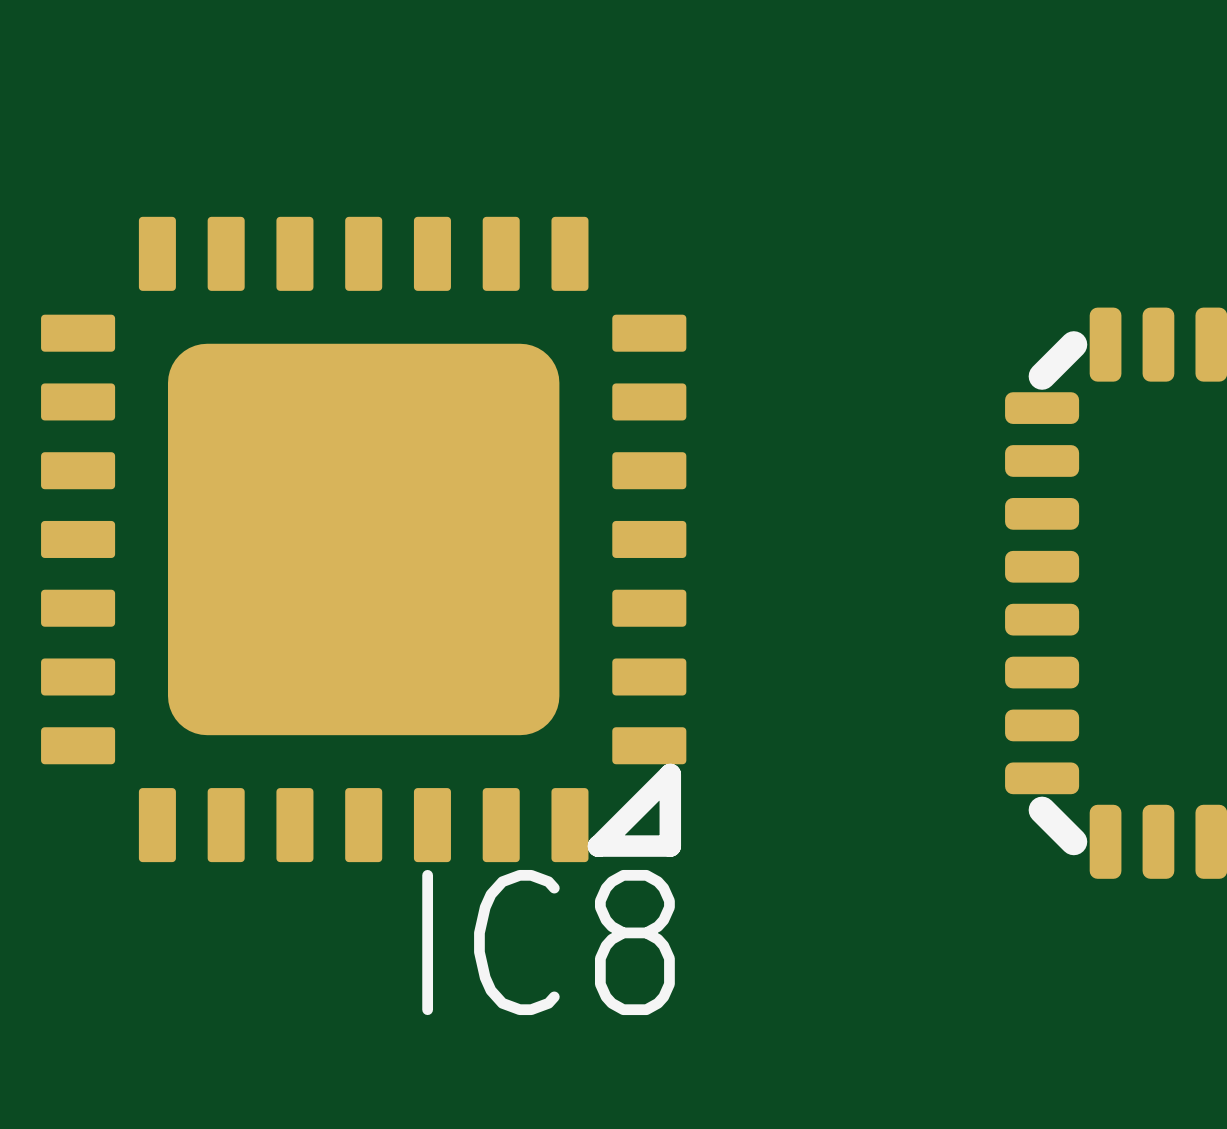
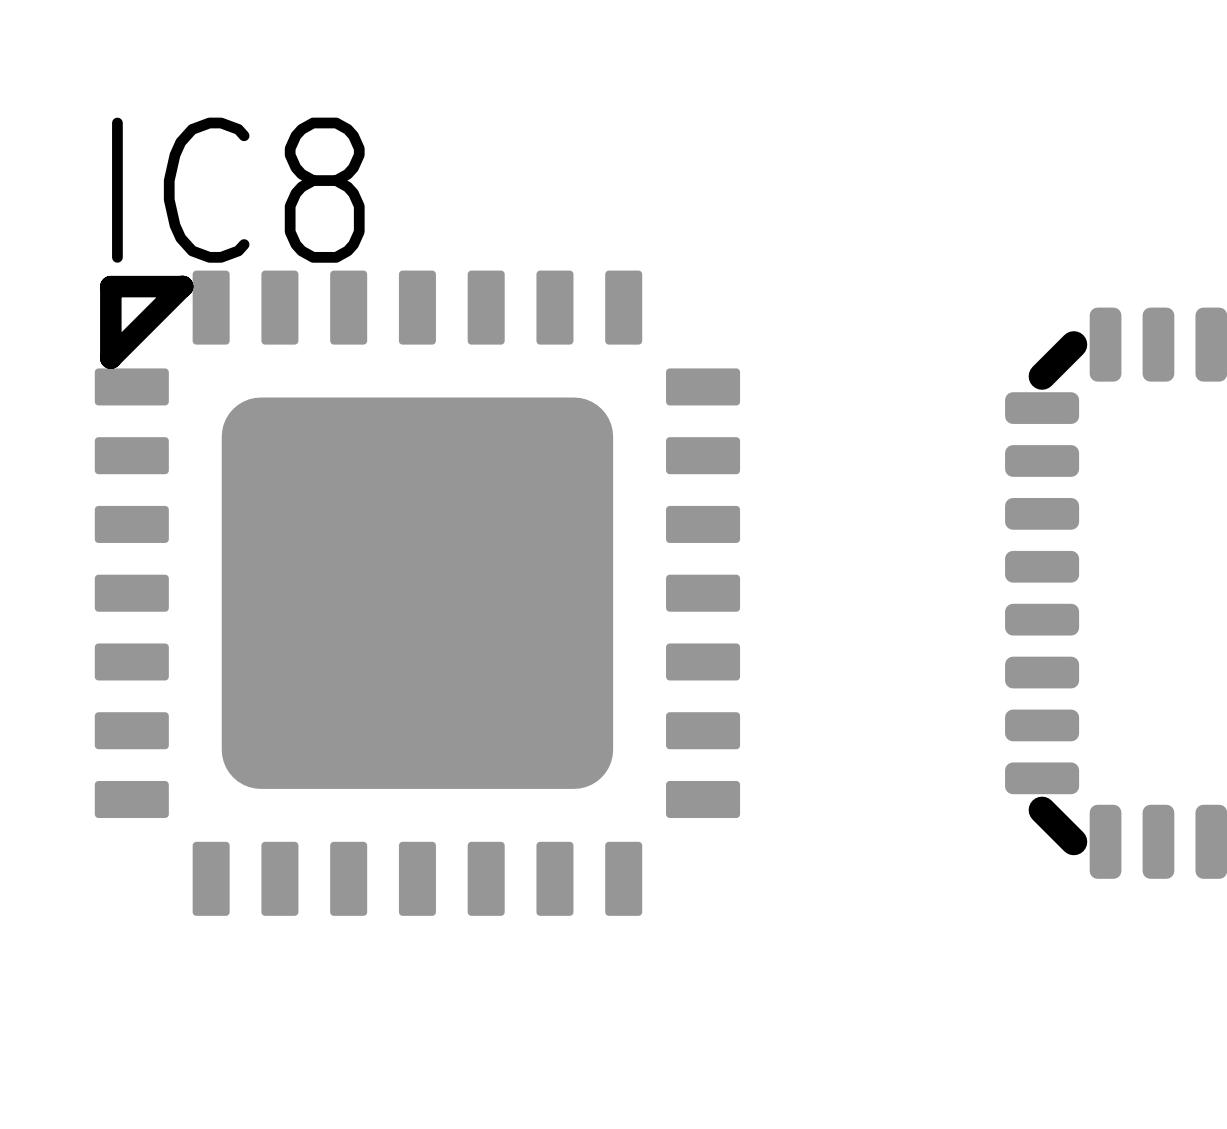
IC8 rotation: 0° (363, 539) -> 180° (417, 593)

